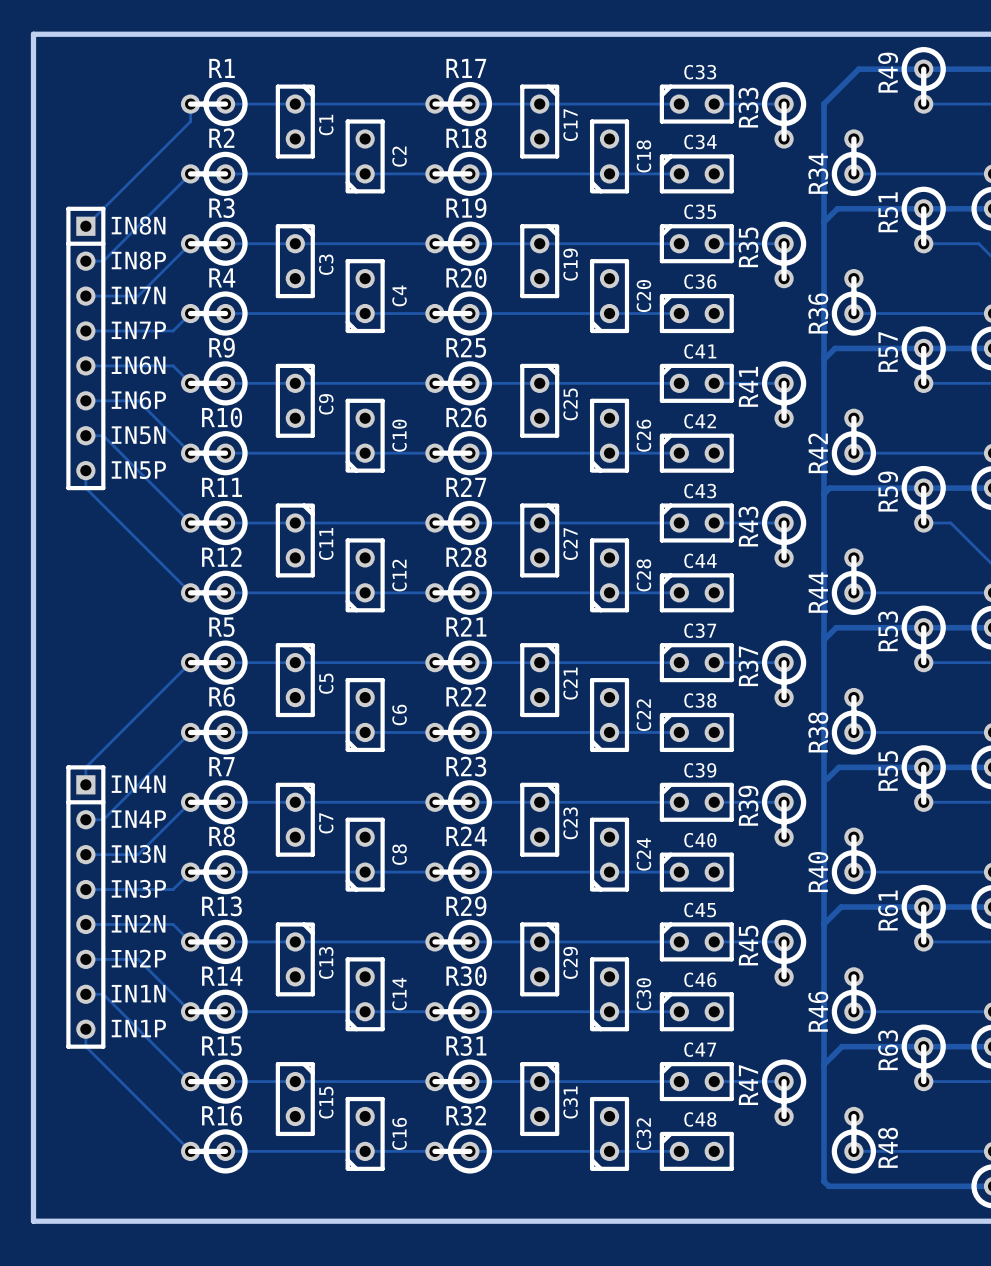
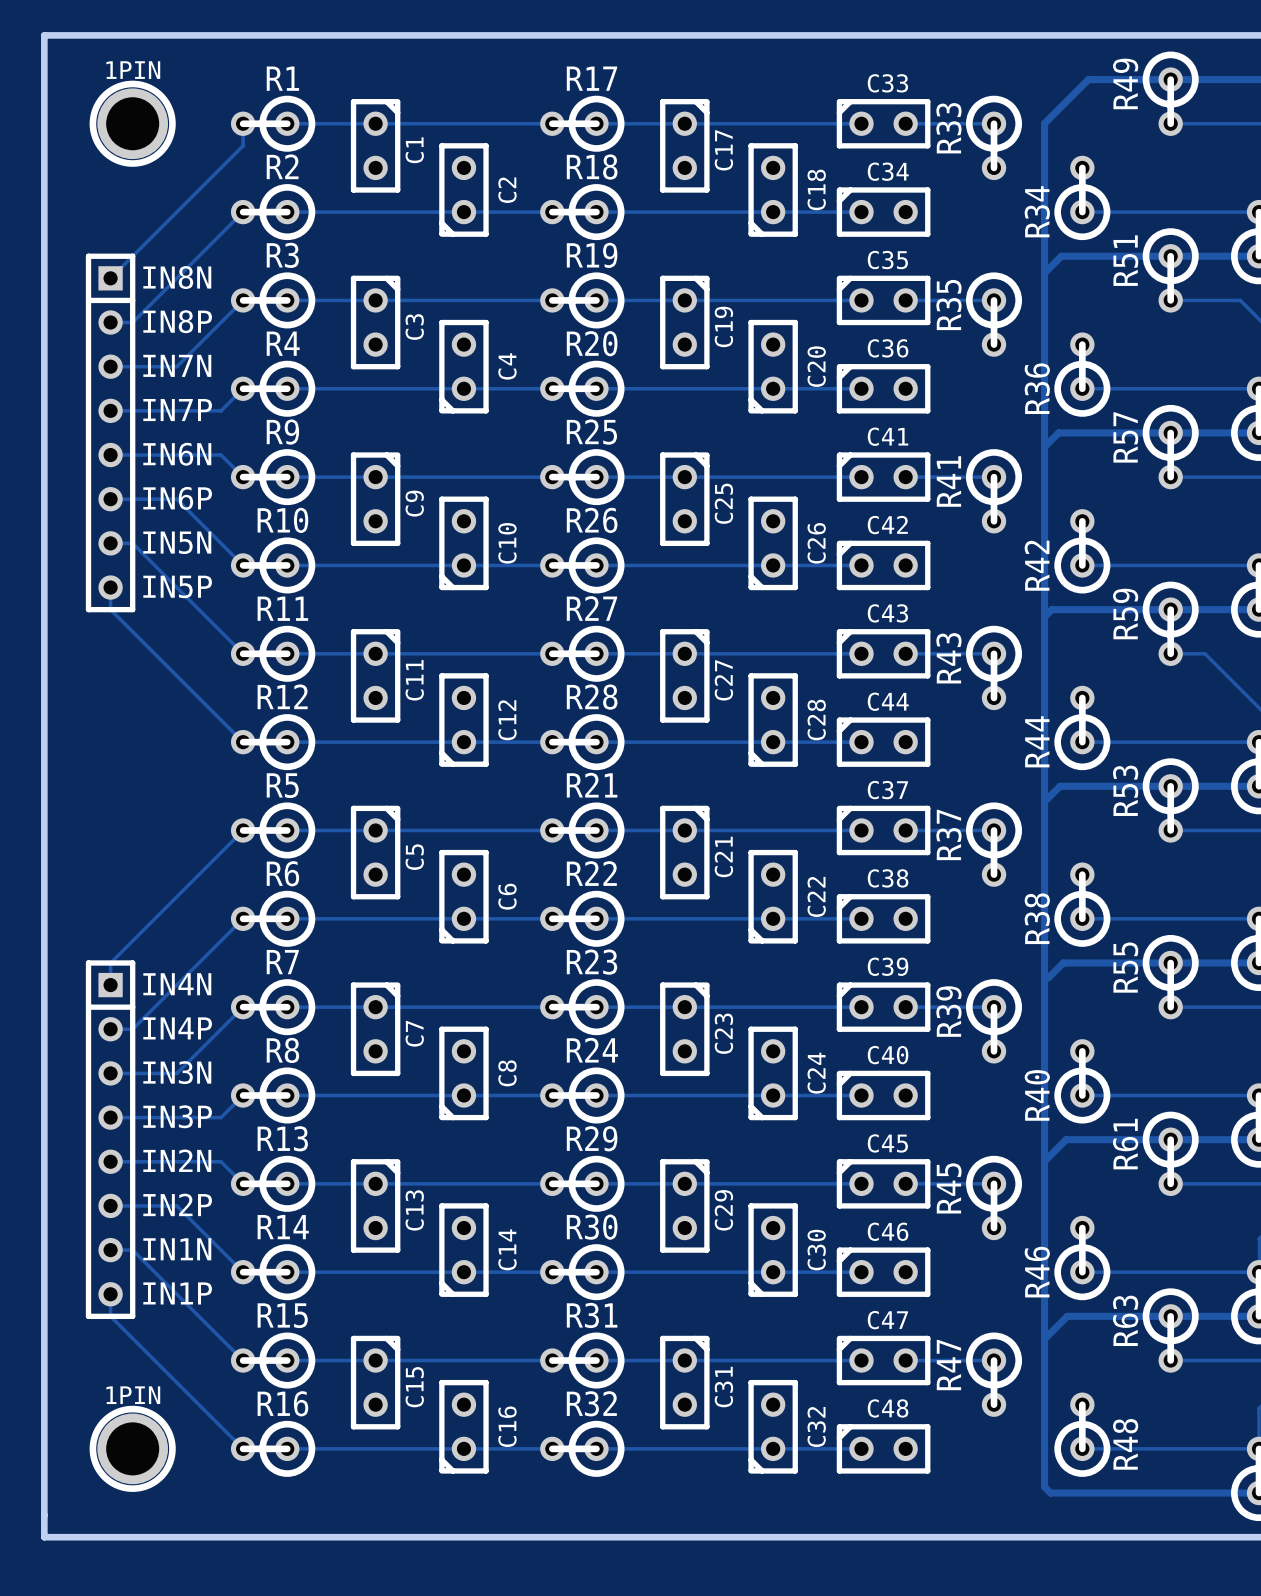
1PIN: none -> (132, 123)
1PIN: none -> (132, 1448)

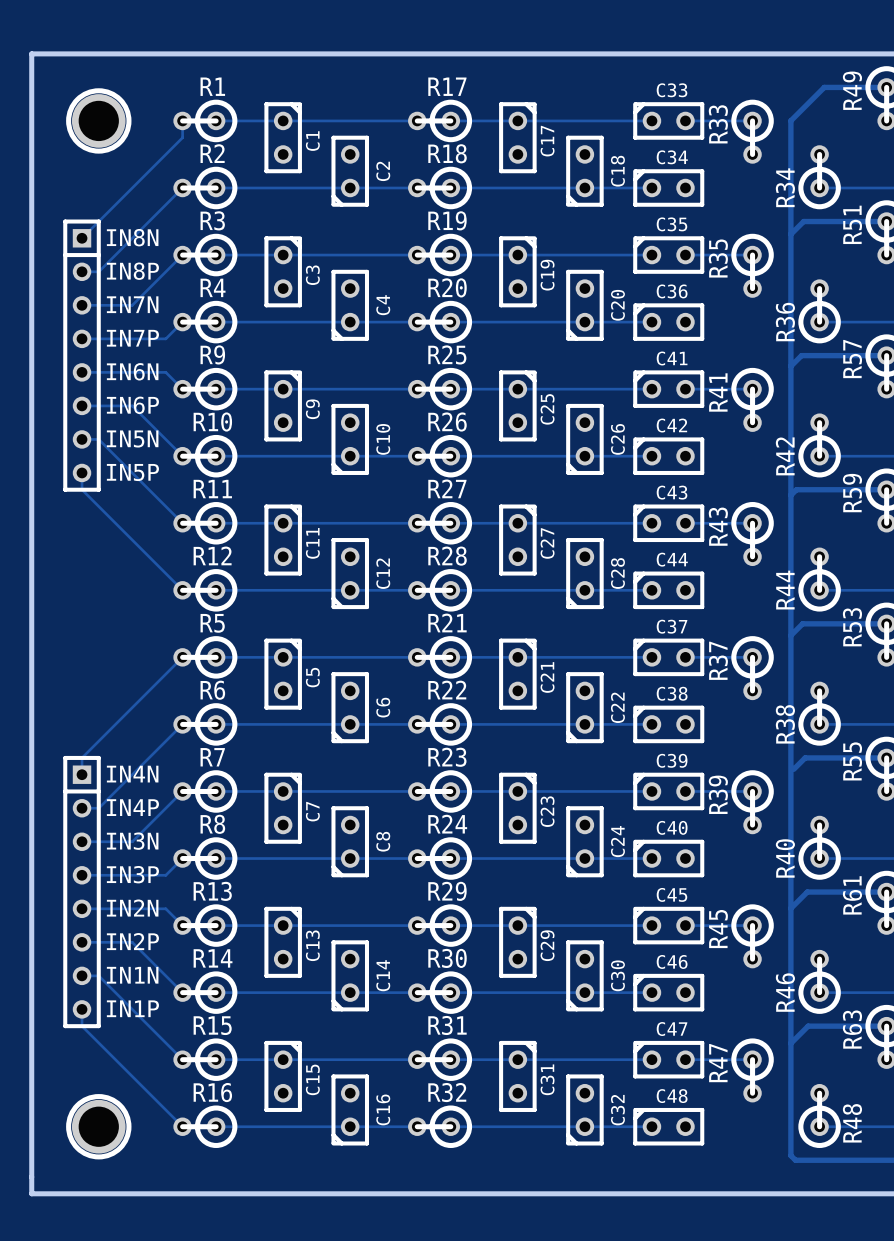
1PIN name: 1PIN (133, 70) -> none
1PIN name: 1PIN (133, 1395) -> none

